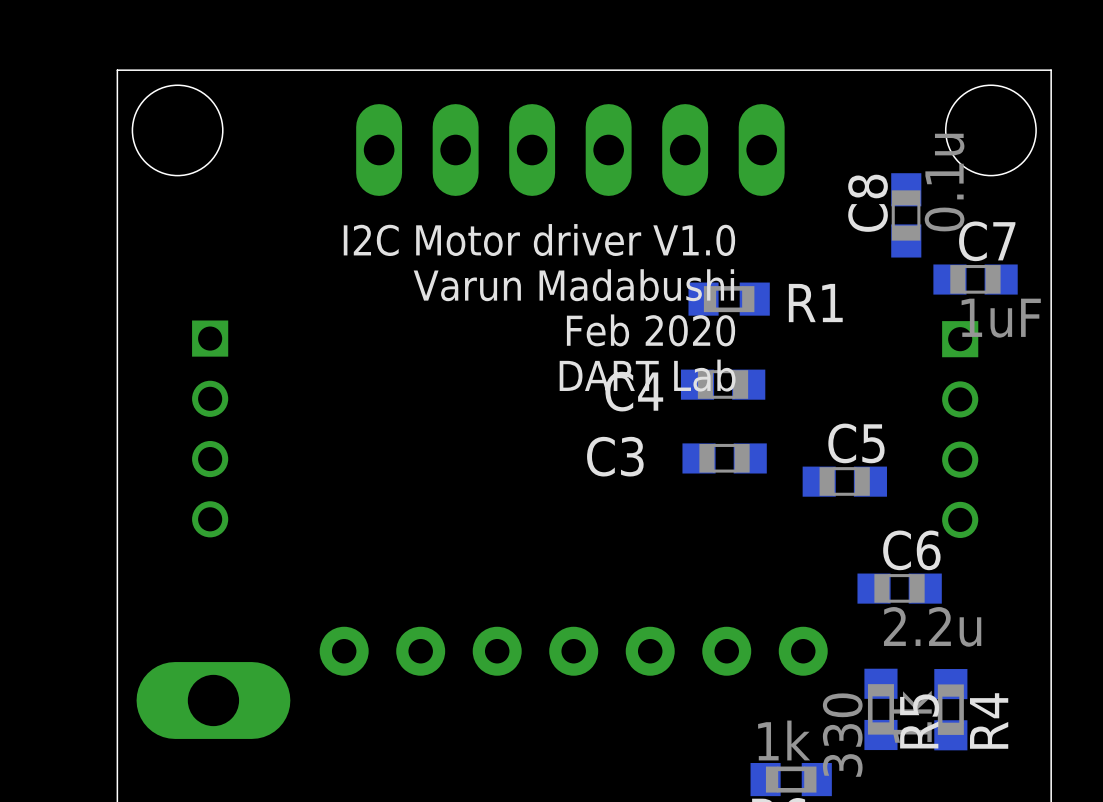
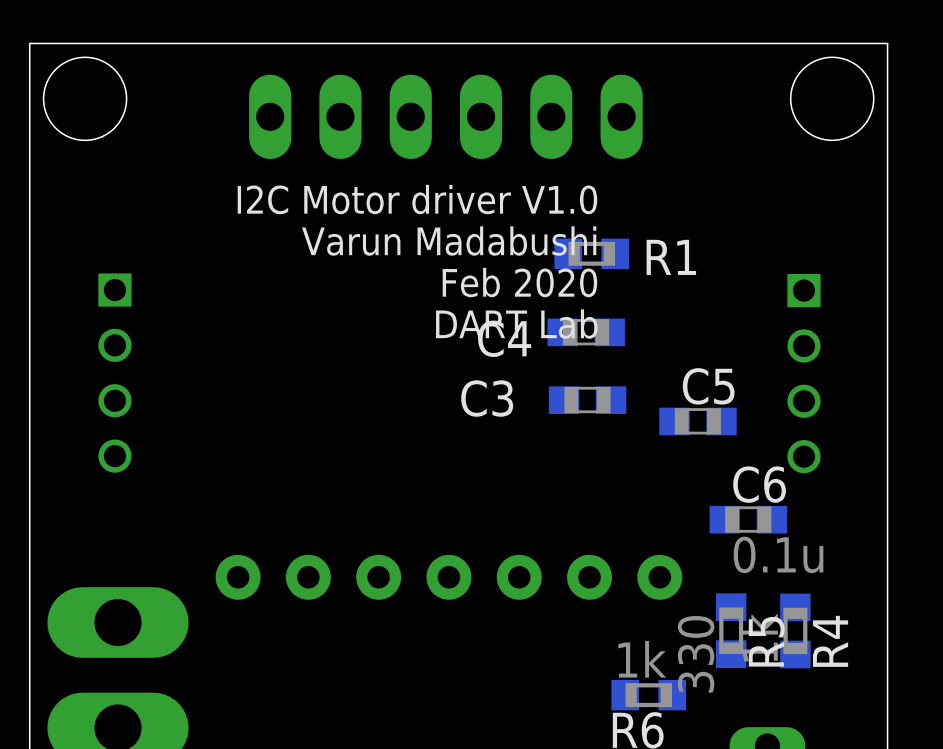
C8: 0.1u (906, 215) -> none
C7: 1uF (975, 279) -> none
C6 value: 2.2u (932, 626) -> 0.1u (778, 554)

